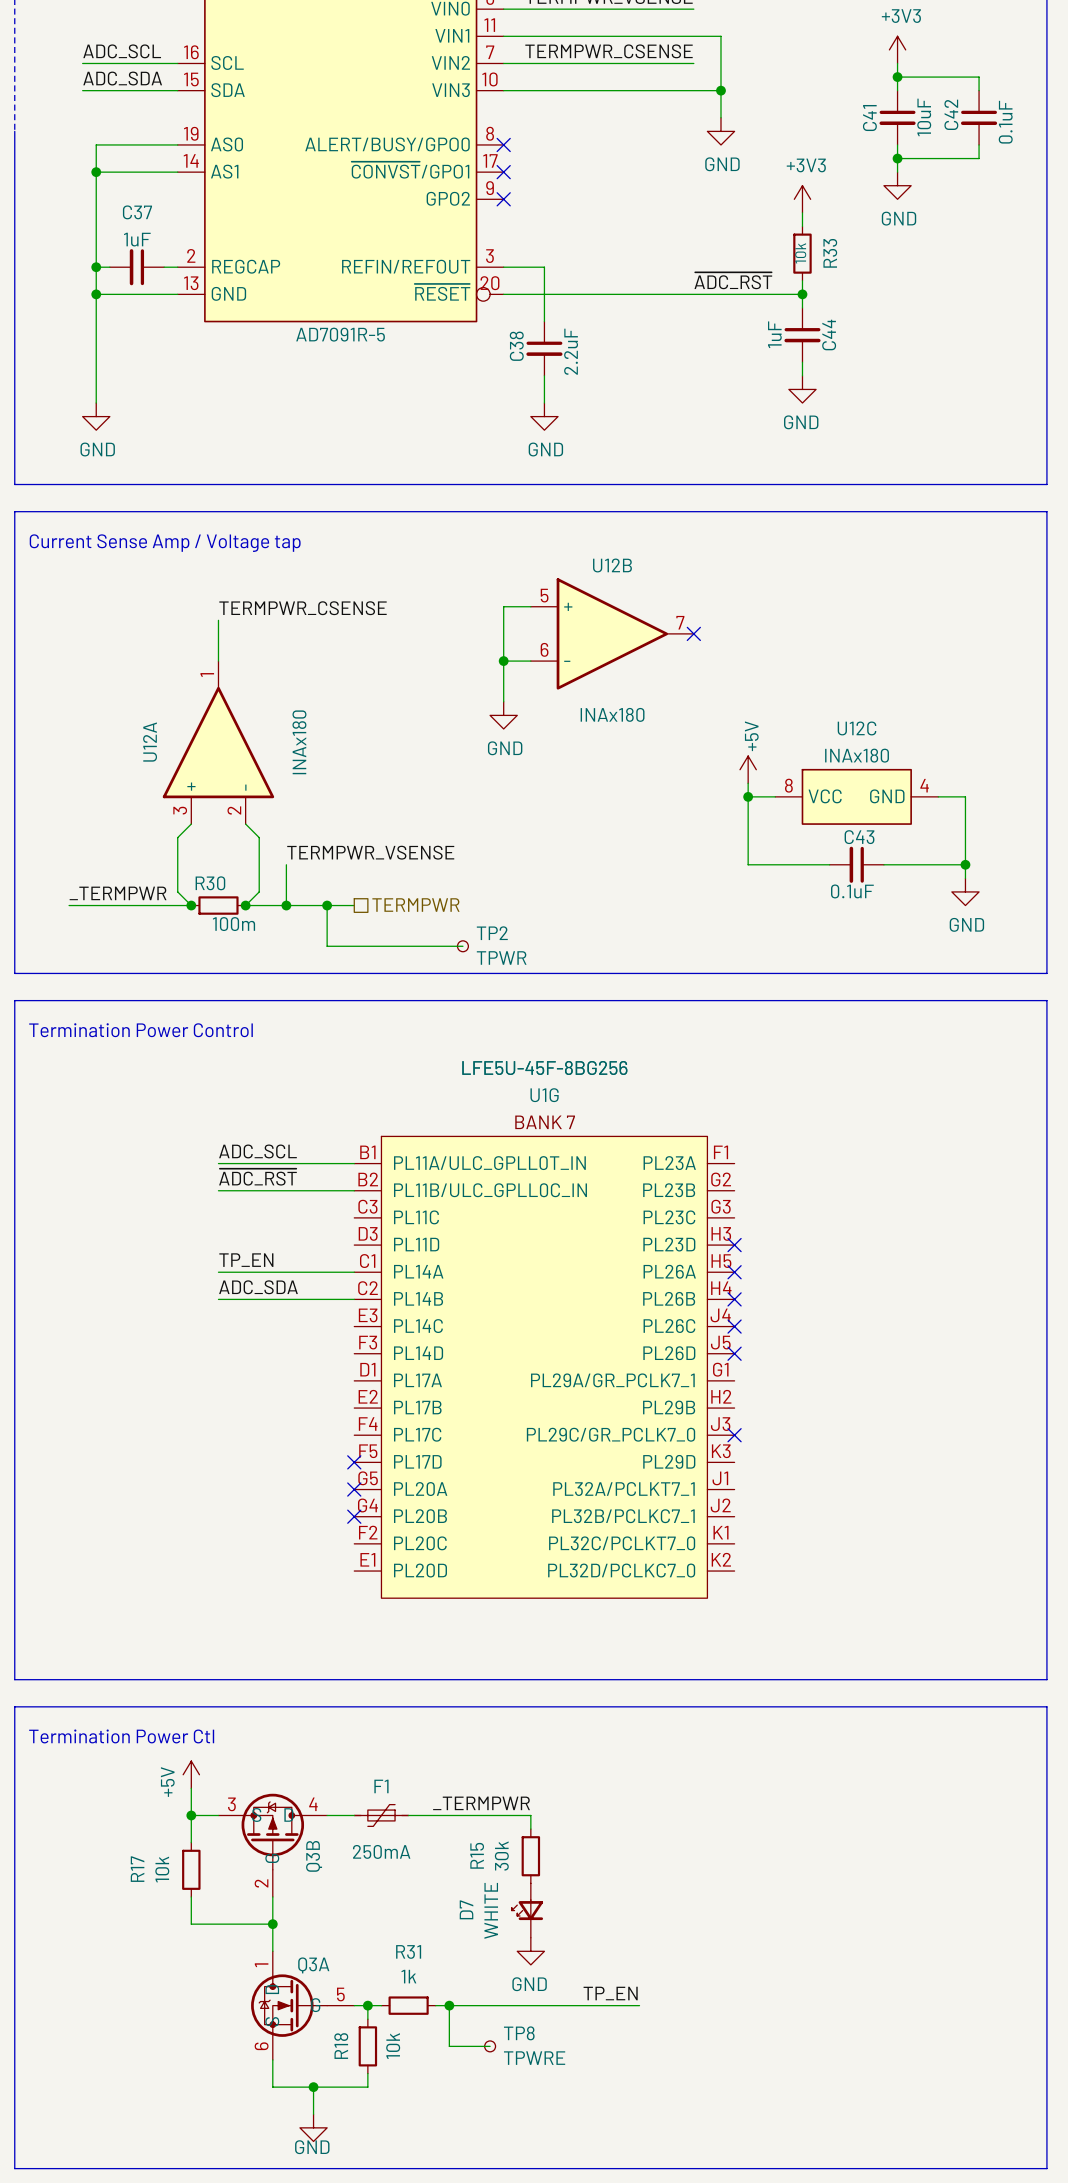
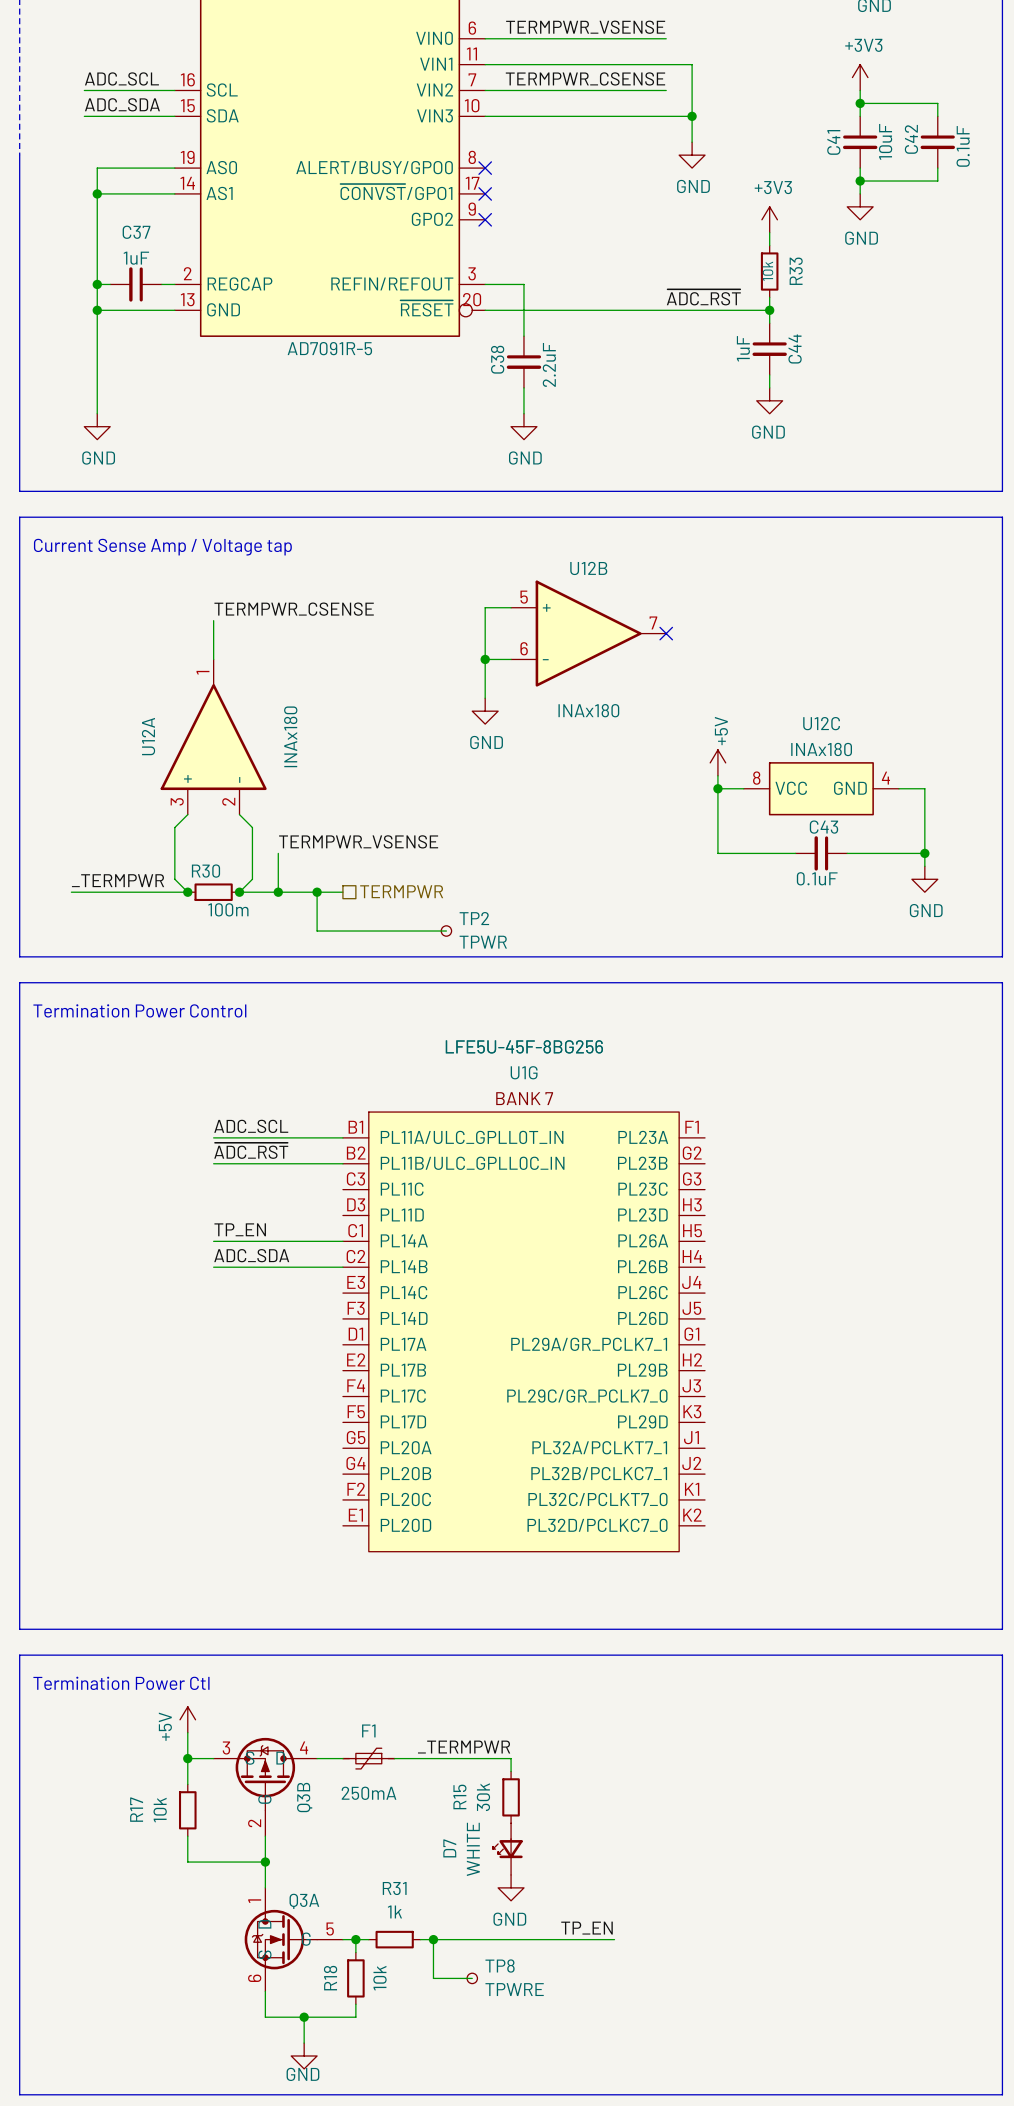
no-connect mark: (734, 1245) -> none
no-connect mark: (734, 1272) -> none
no-connect mark: (734, 1299) -> none
no-connect mark: (734, 1326) -> none
no-connect mark: (734, 1353) -> none
no-connect mark: (734, 1435) -> none
no-connect mark: (354, 1462) -> none
no-connect mark: (354, 1489) -> none
no-connect mark: (354, 1516) -> none

